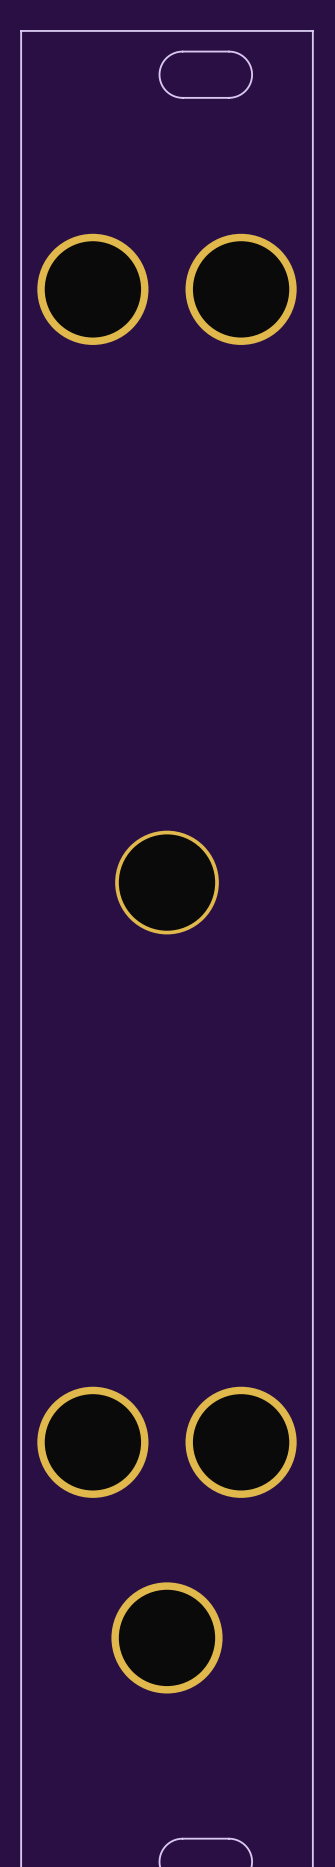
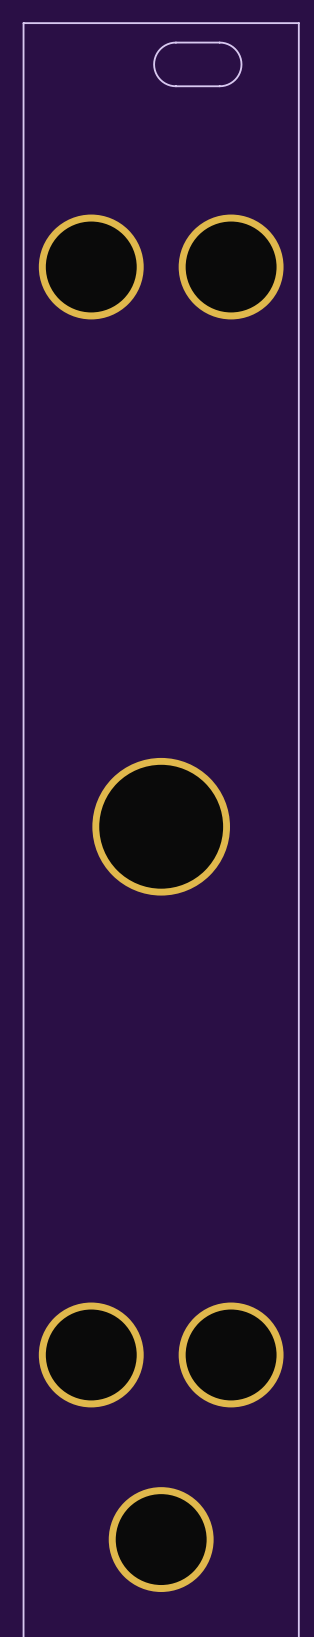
part footprint: [115, 830, 219, 935] -> [92, 757, 231, 896]

